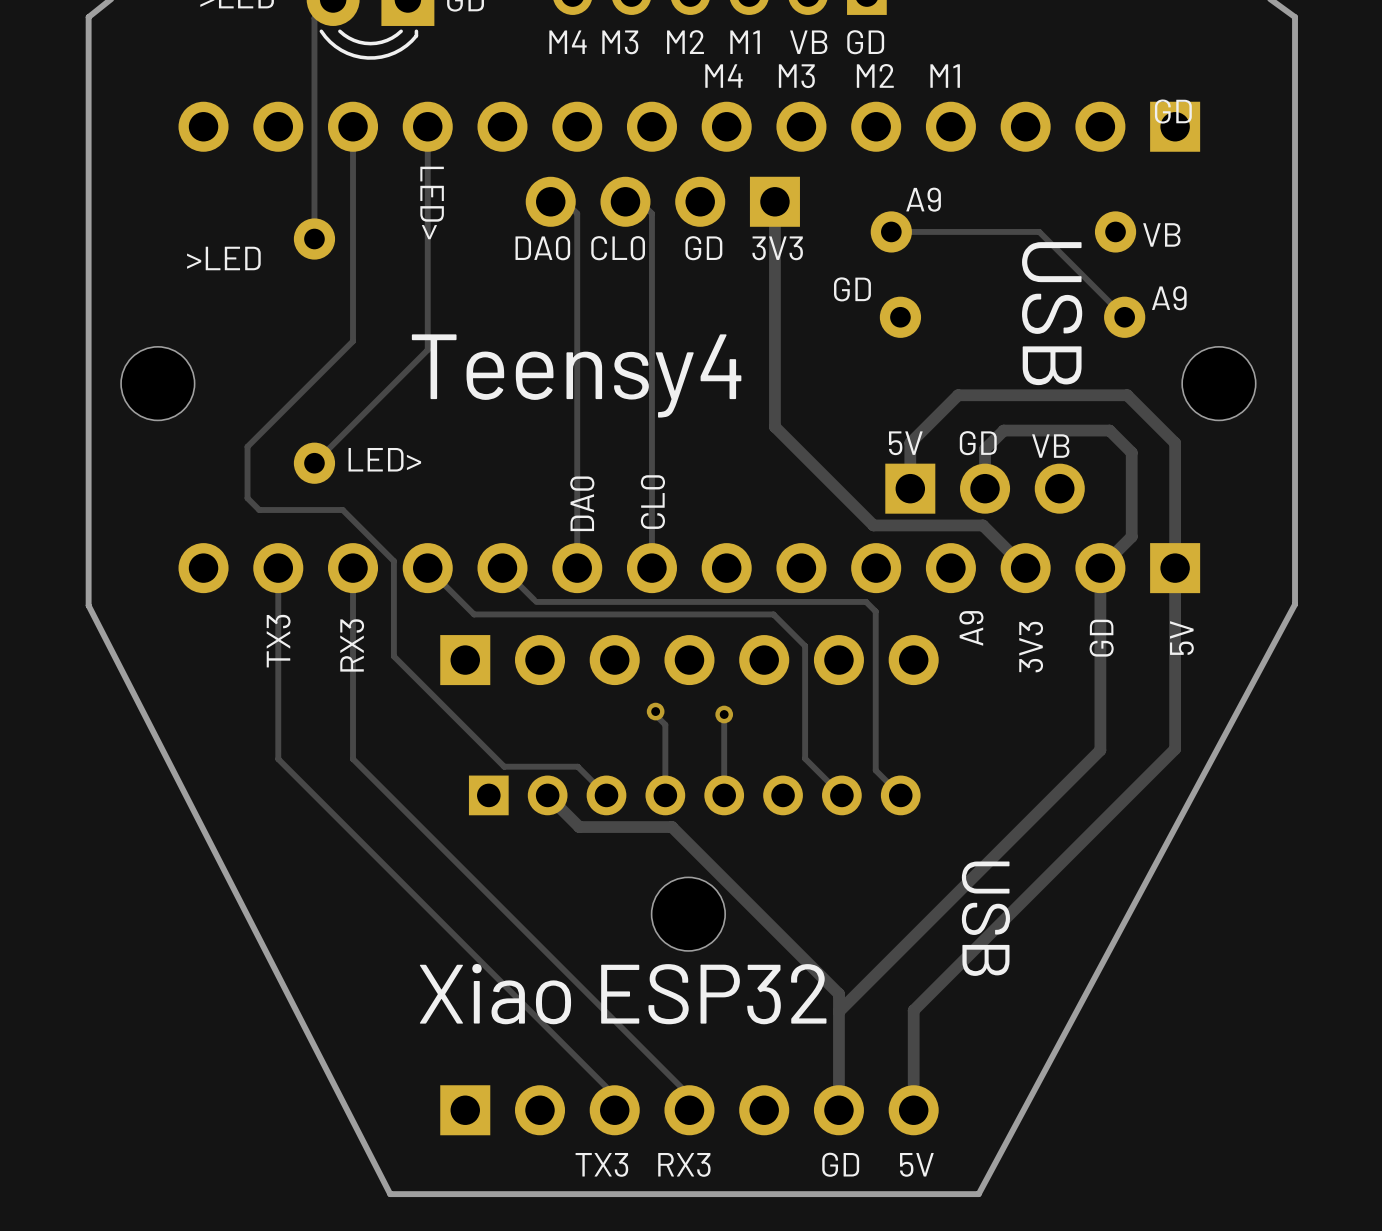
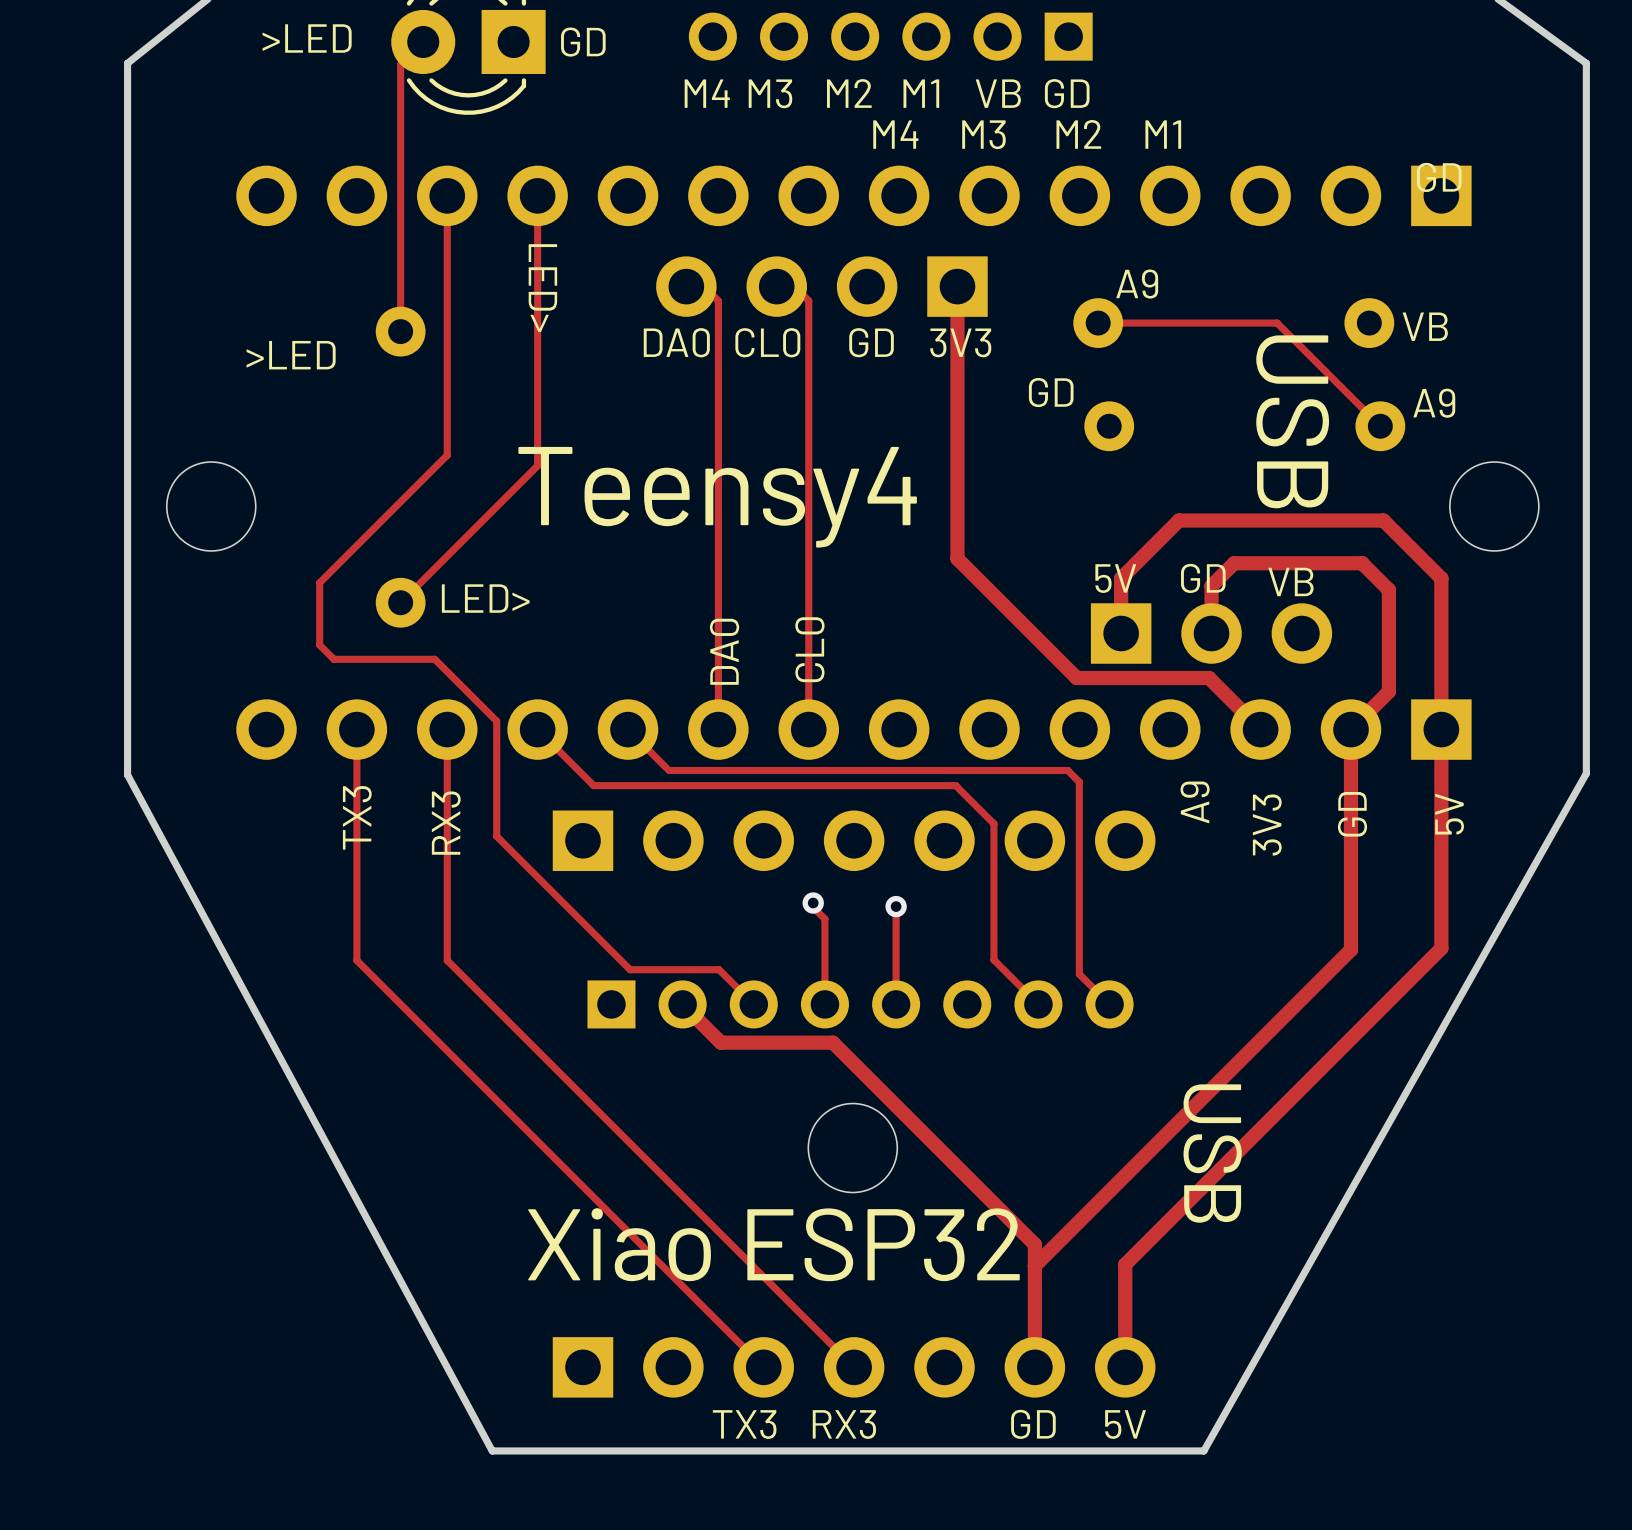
board edge: (1295, 604) (978, 1194) (390, 1194) (88, 605) -> (1586, 773) (1203, 1450) (492, 1450) (127, 774)
part position: (689, 1110) -> (854, 1367)
text position: TX3 (601, 1164) -> TX3 (744, 1424)
text position: RX3 (684, 1164) -> RX3 (844, 1424)
text position: GD (840, 1164) -> GD (1033, 1424)
text position: 5V (916, 1164) -> 5V (1125, 1424)

